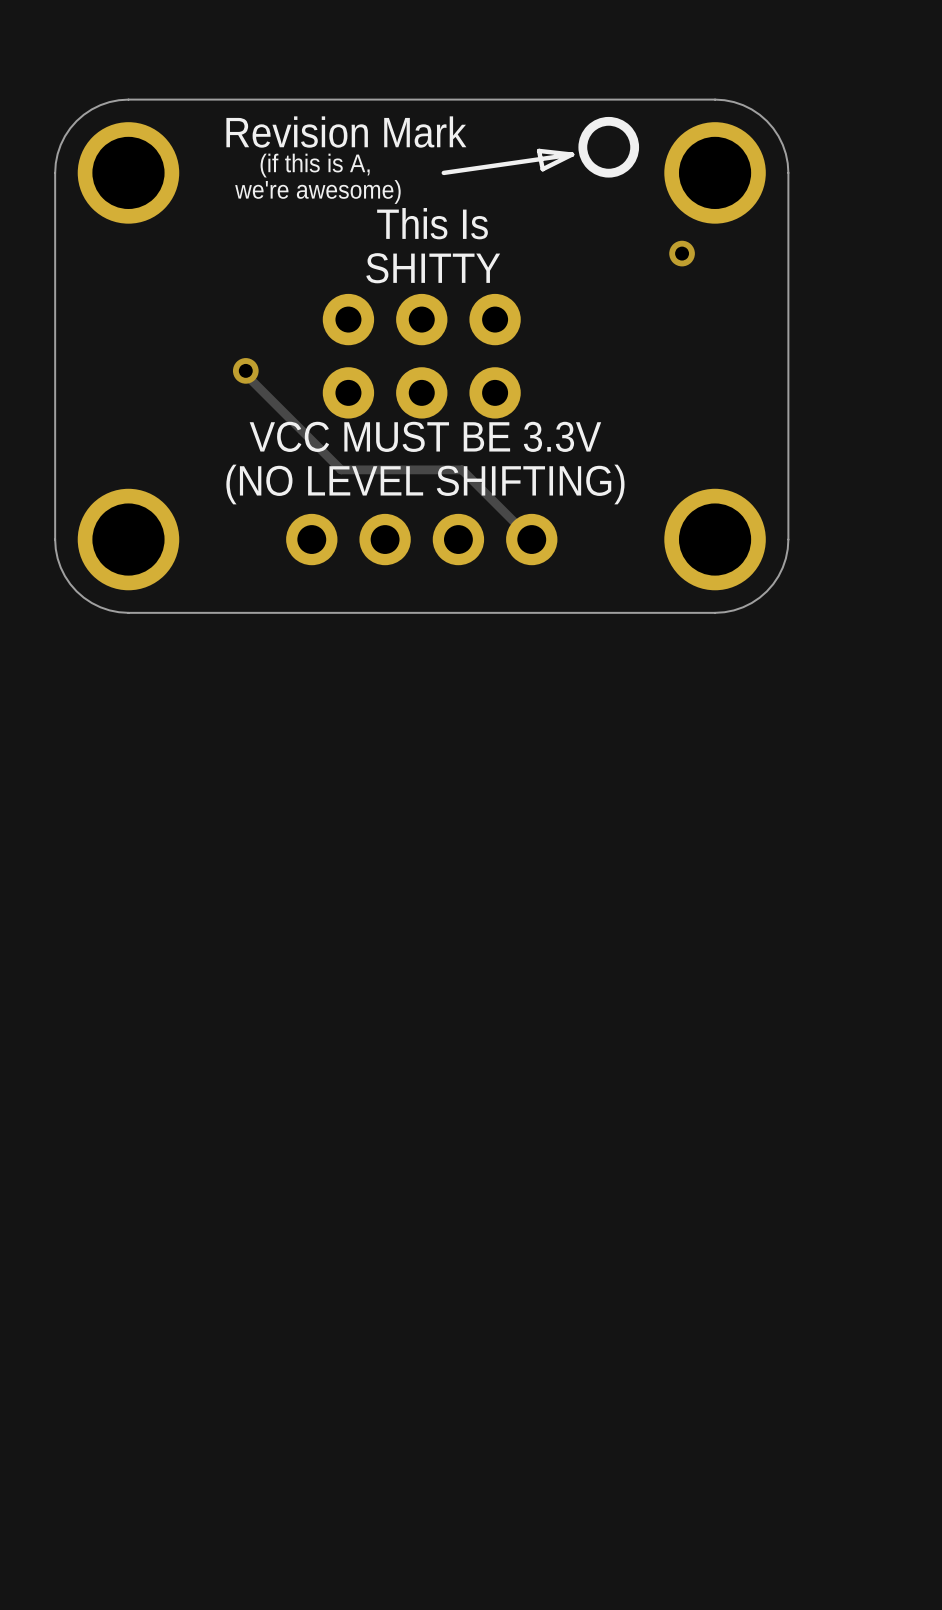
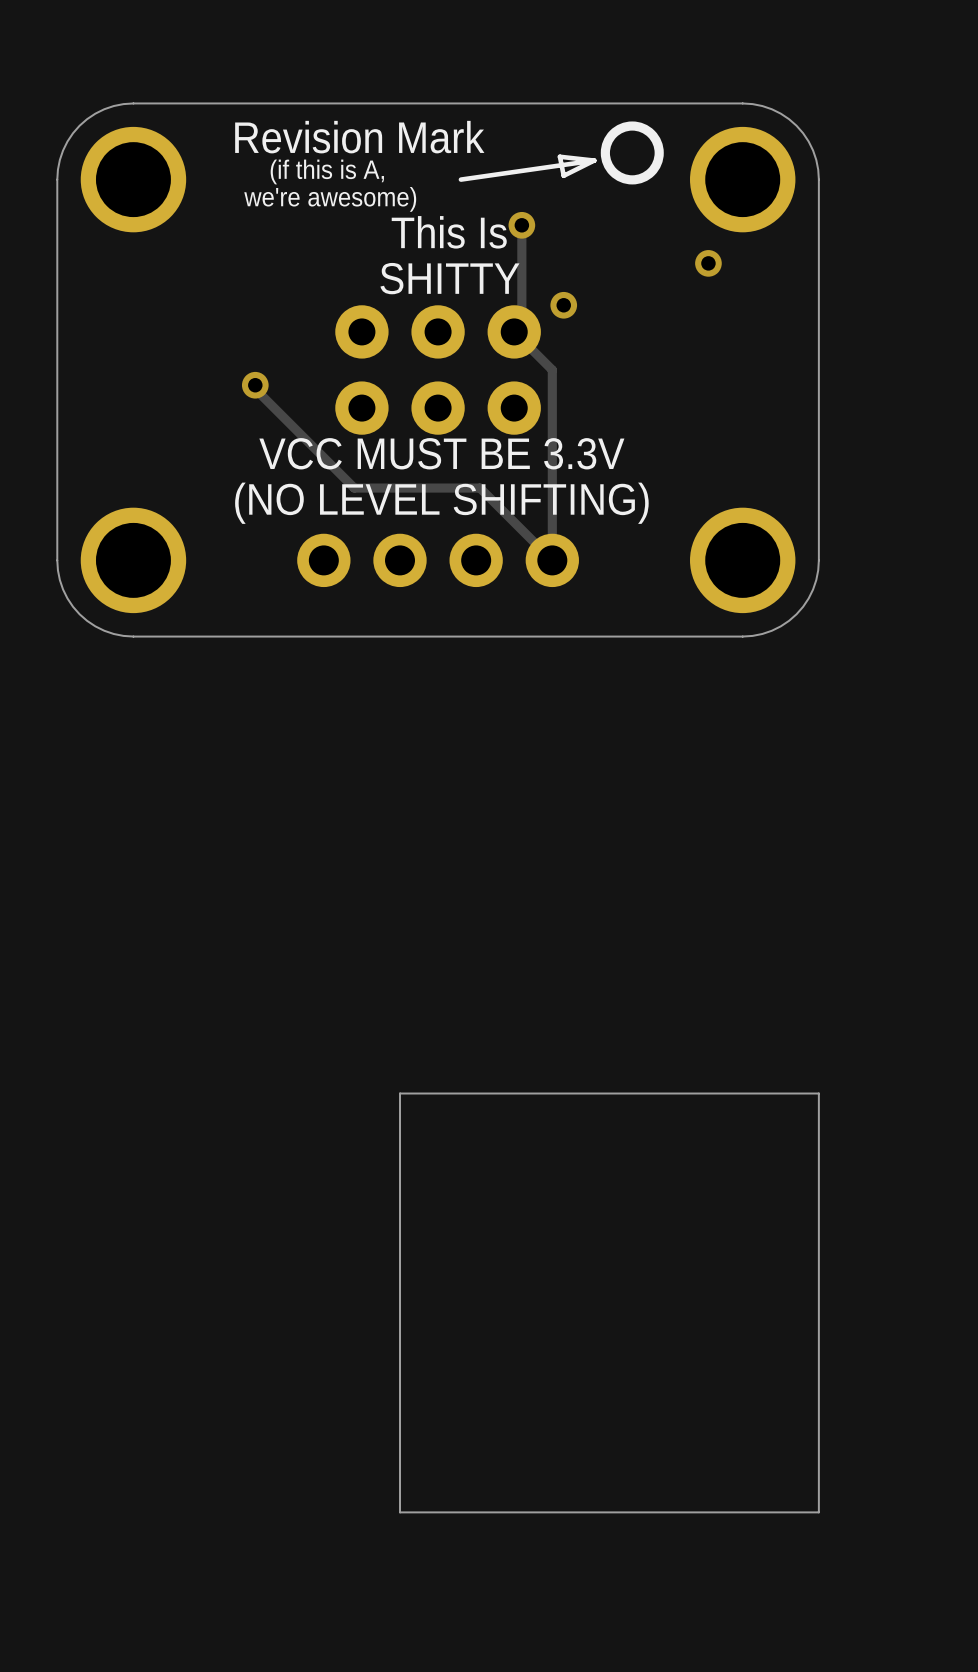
track: none -> (521, 225) (521, 324) (514, 331) (552, 370) (552, 560)
via: none -> (521, 225)
via: none -> (563, 305)
board edge: none -> (818, 1093) (400, 1093) (400, 1512) (818, 1512) (818, 1093)

